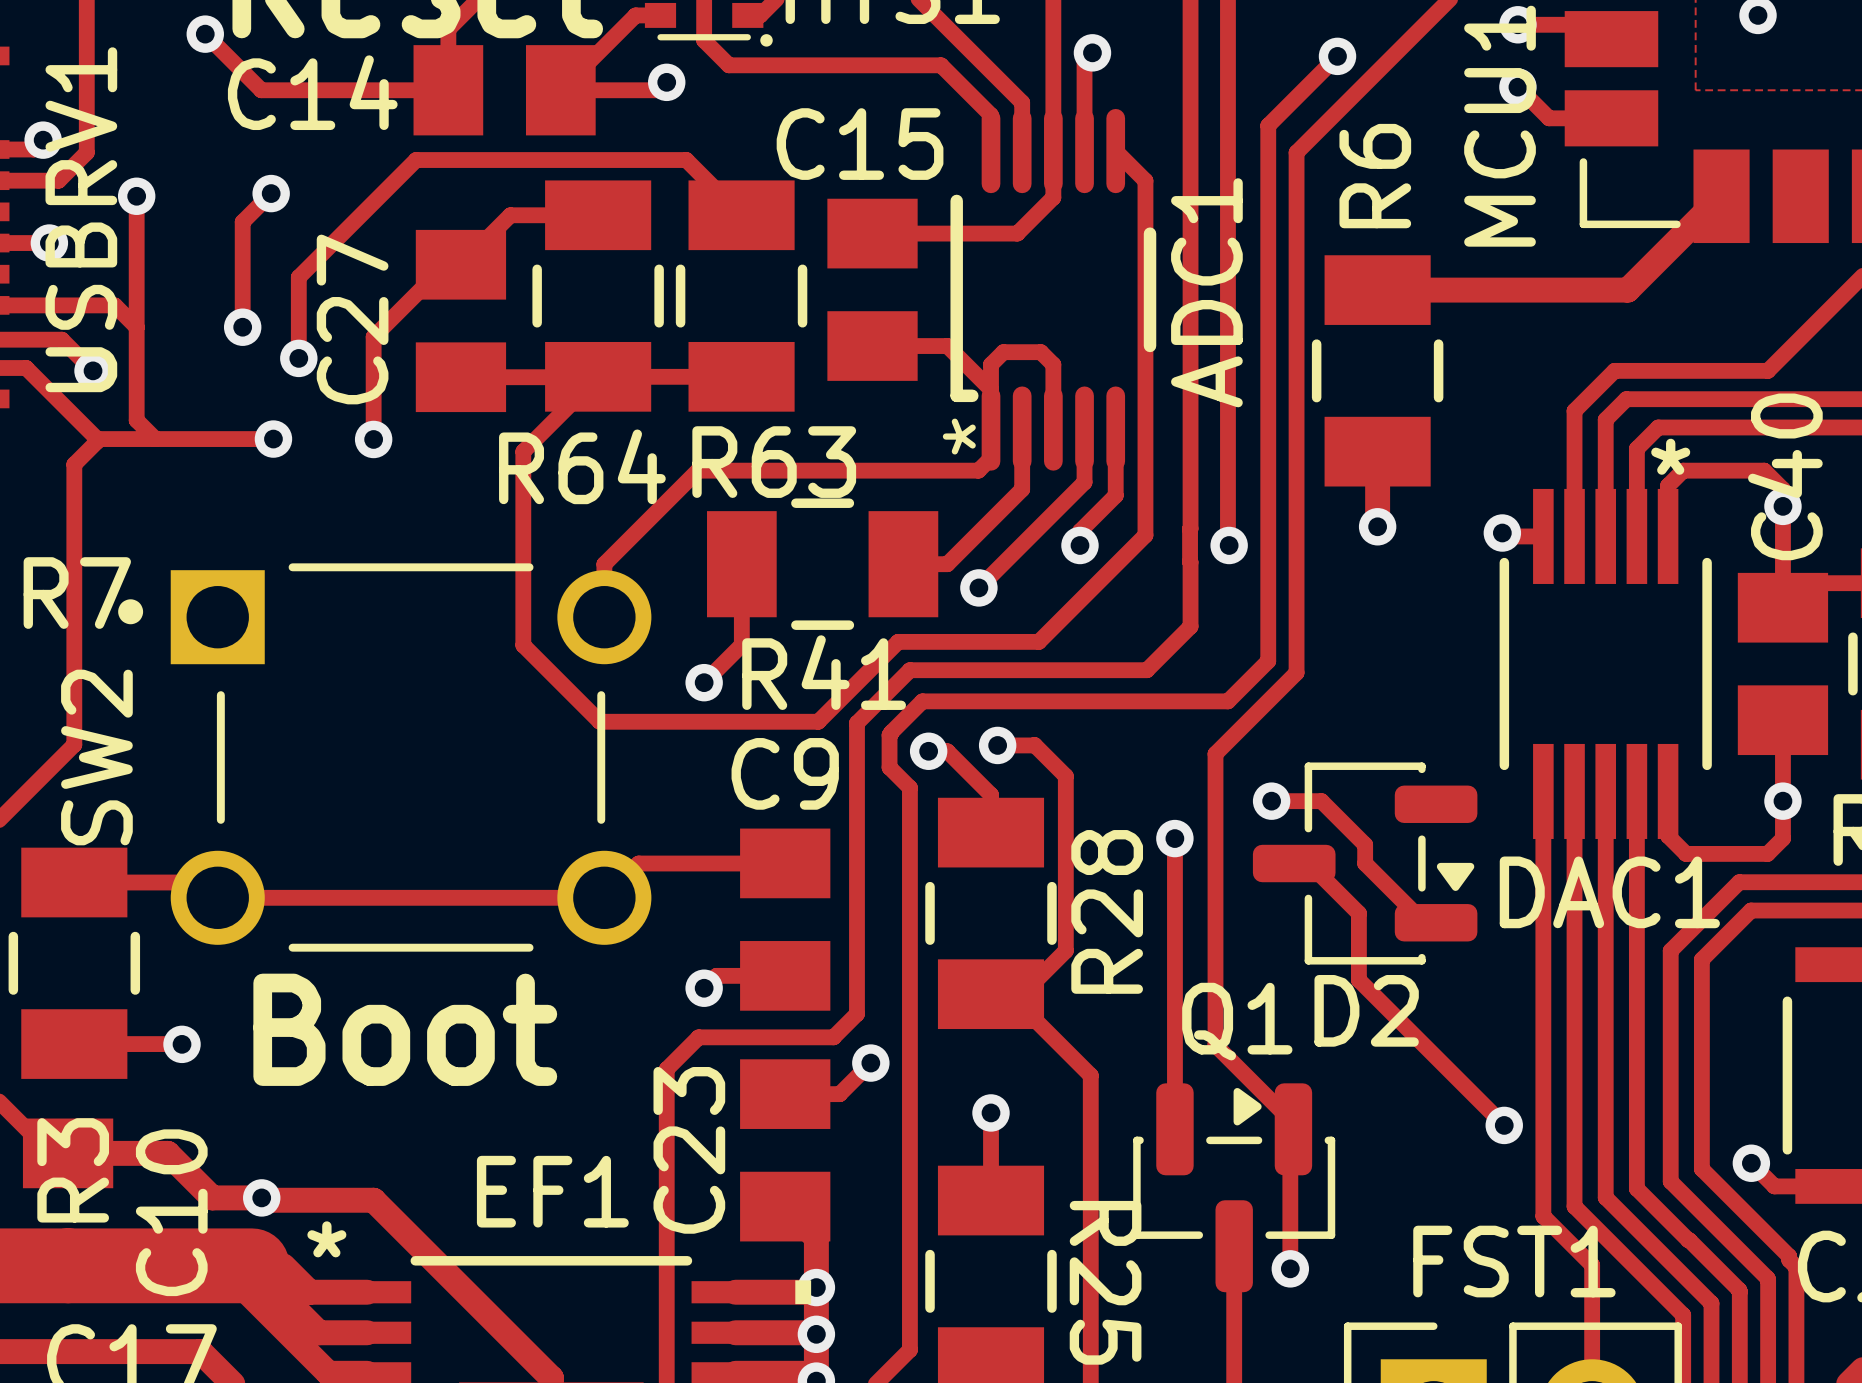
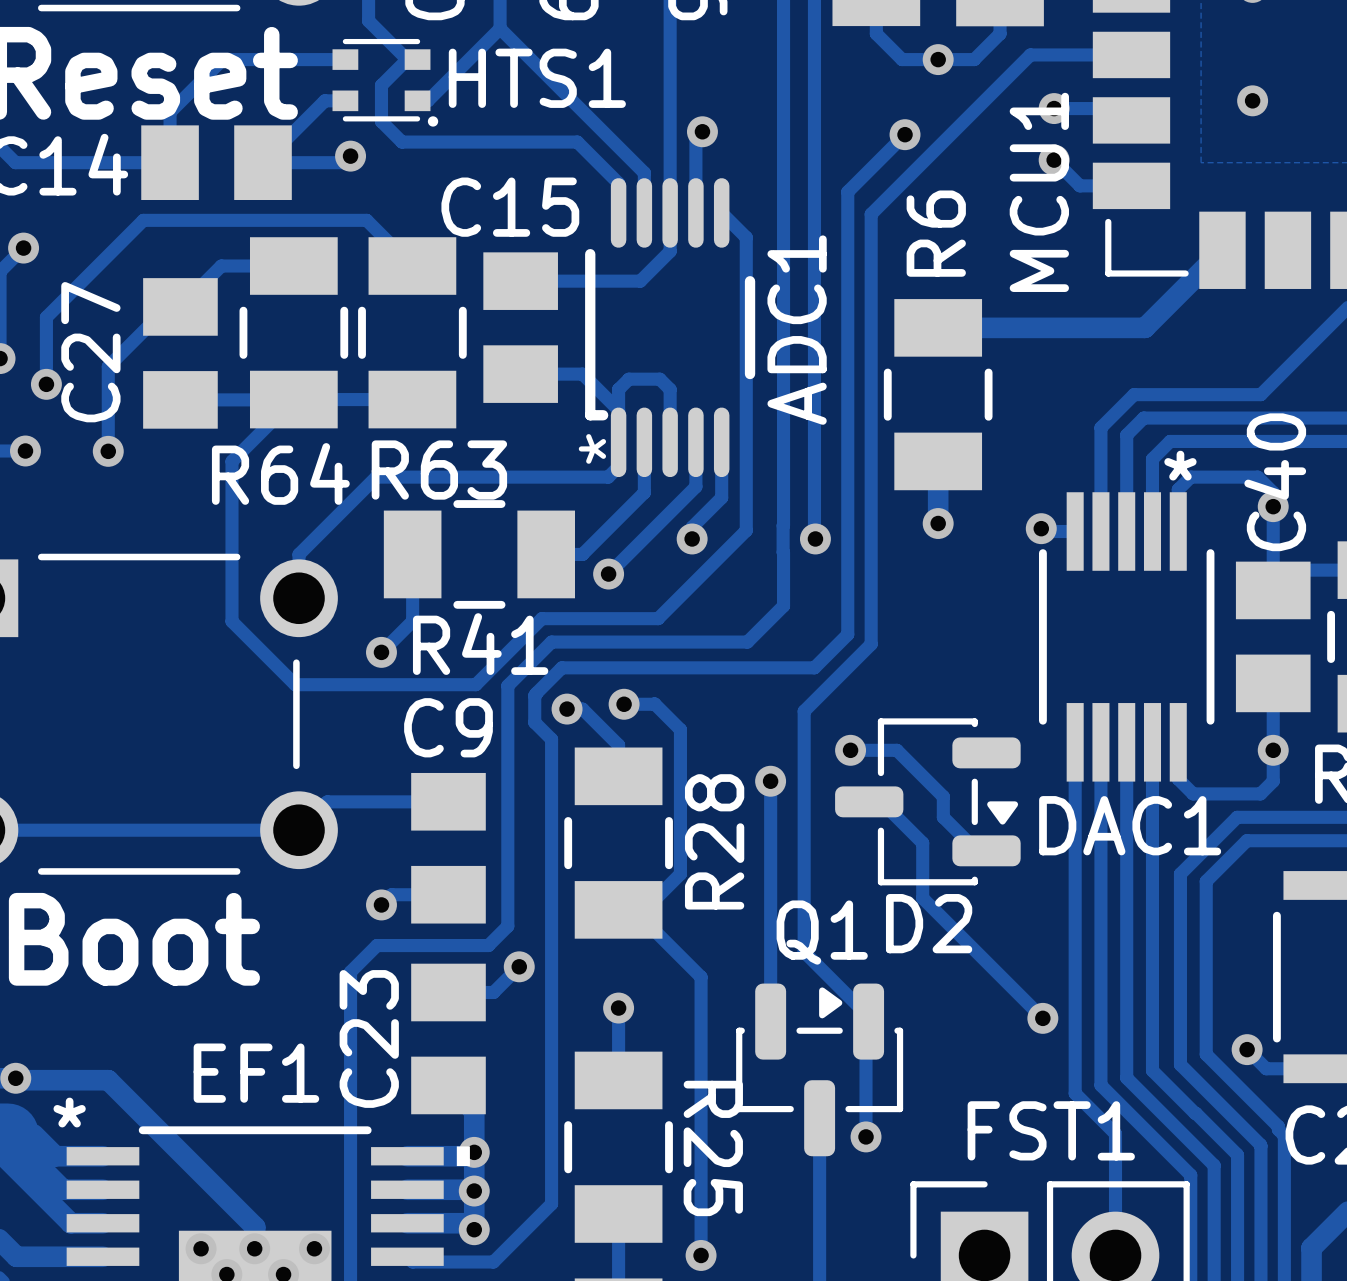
track: (1321, 801) (1365, 844) (1365, 863) (1383, 882) -> (891, 750) (896, 750) (943, 796) (943, 817)

